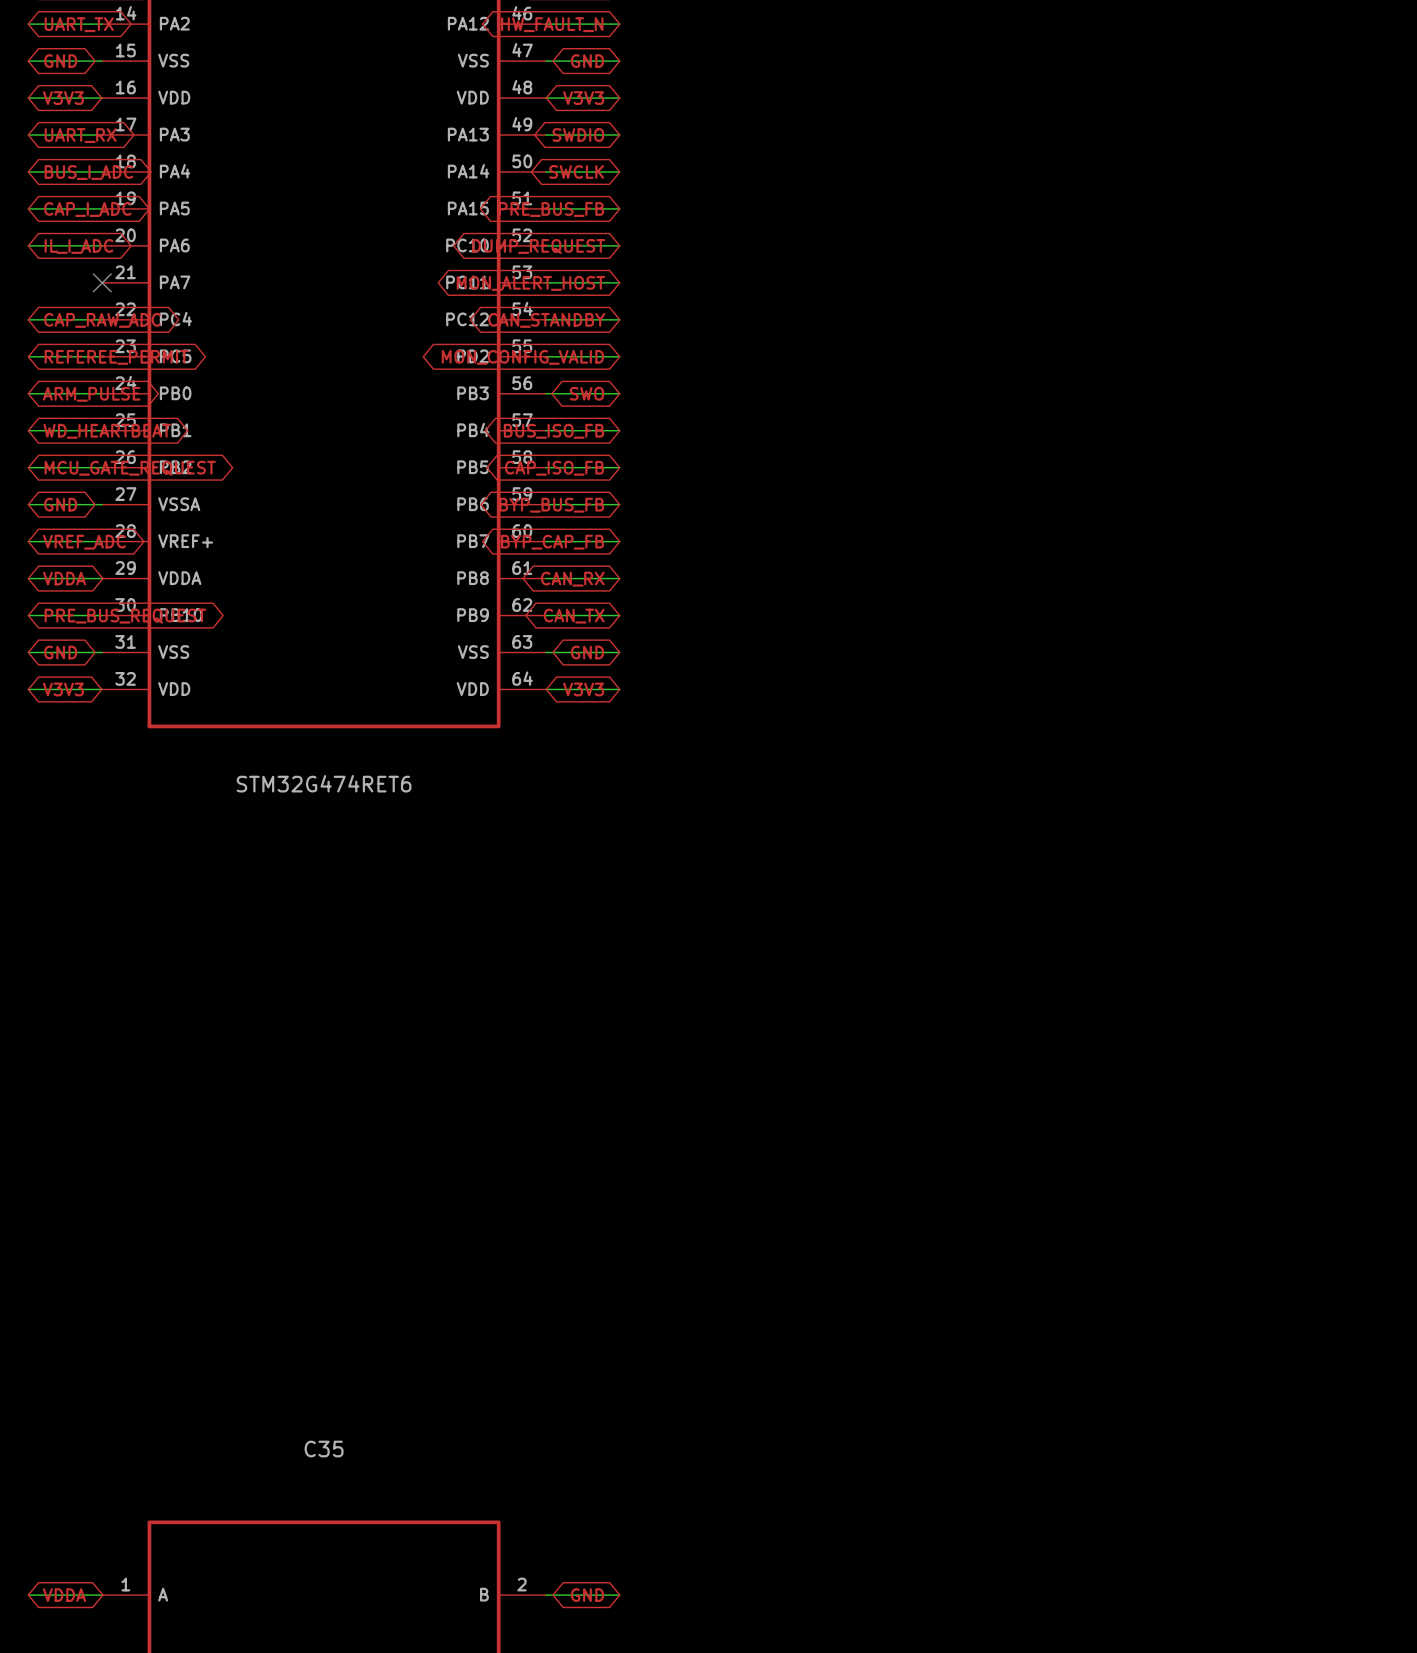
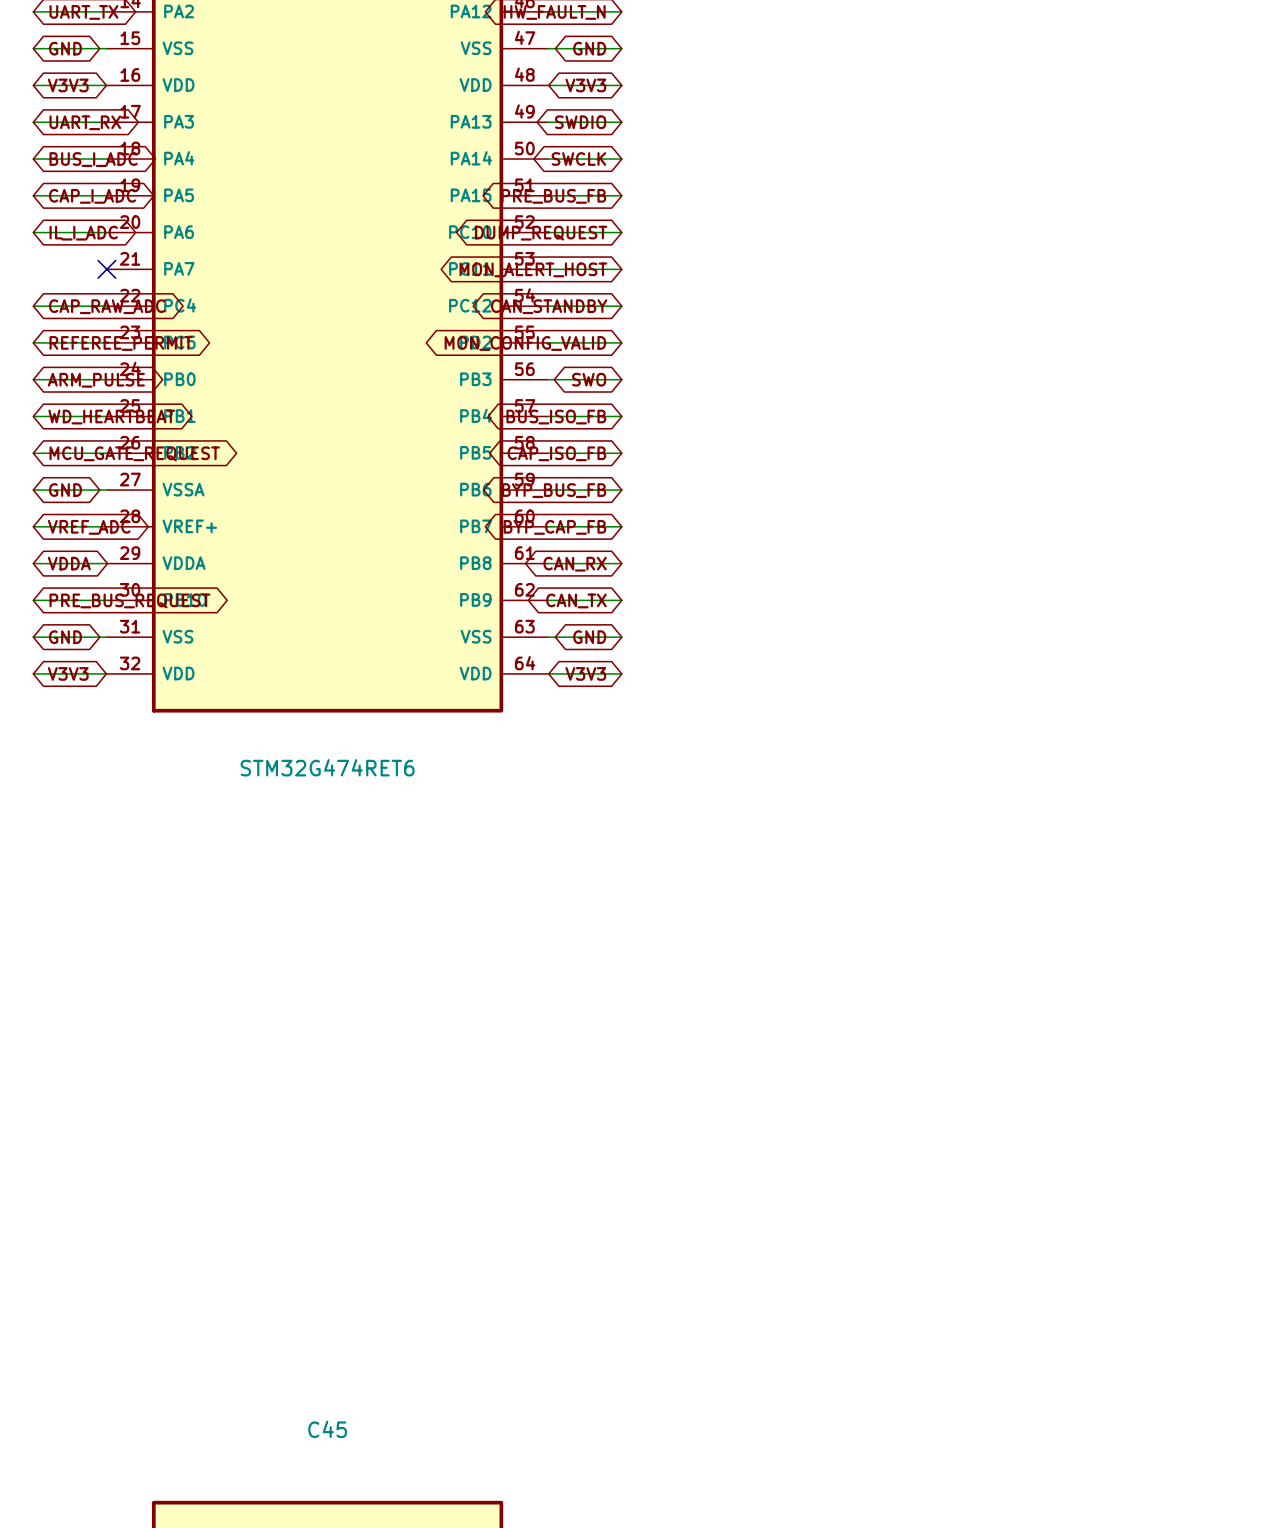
C35 name: C35 (324, 1449) -> C45 (327, 1429)

